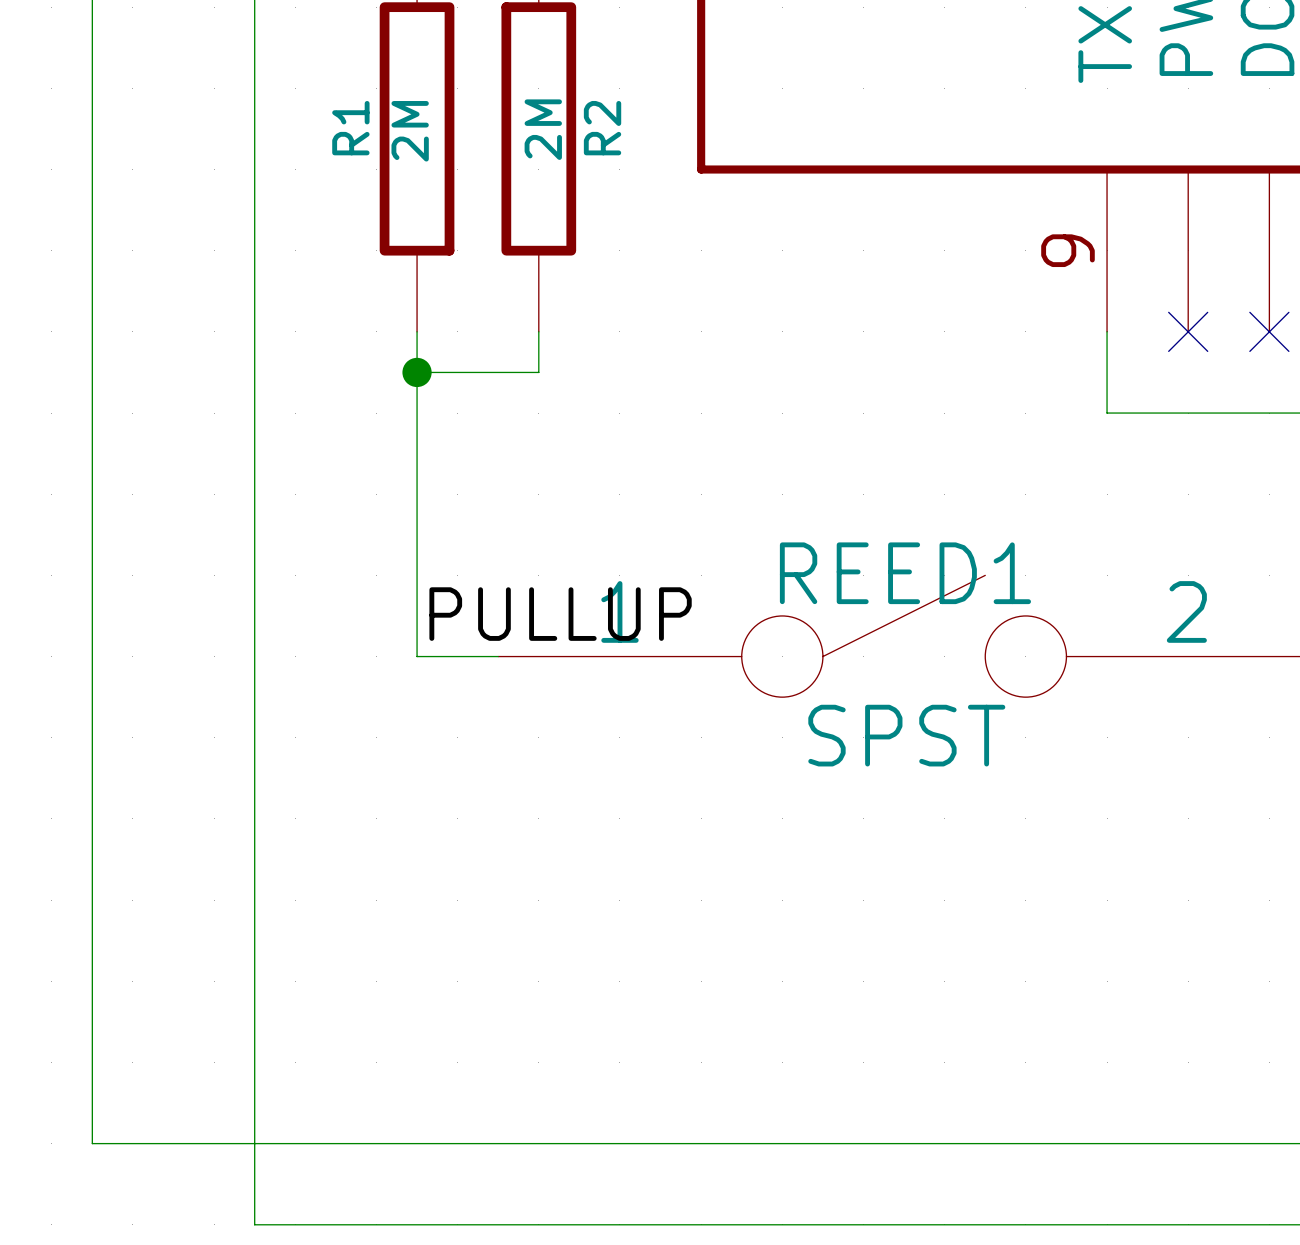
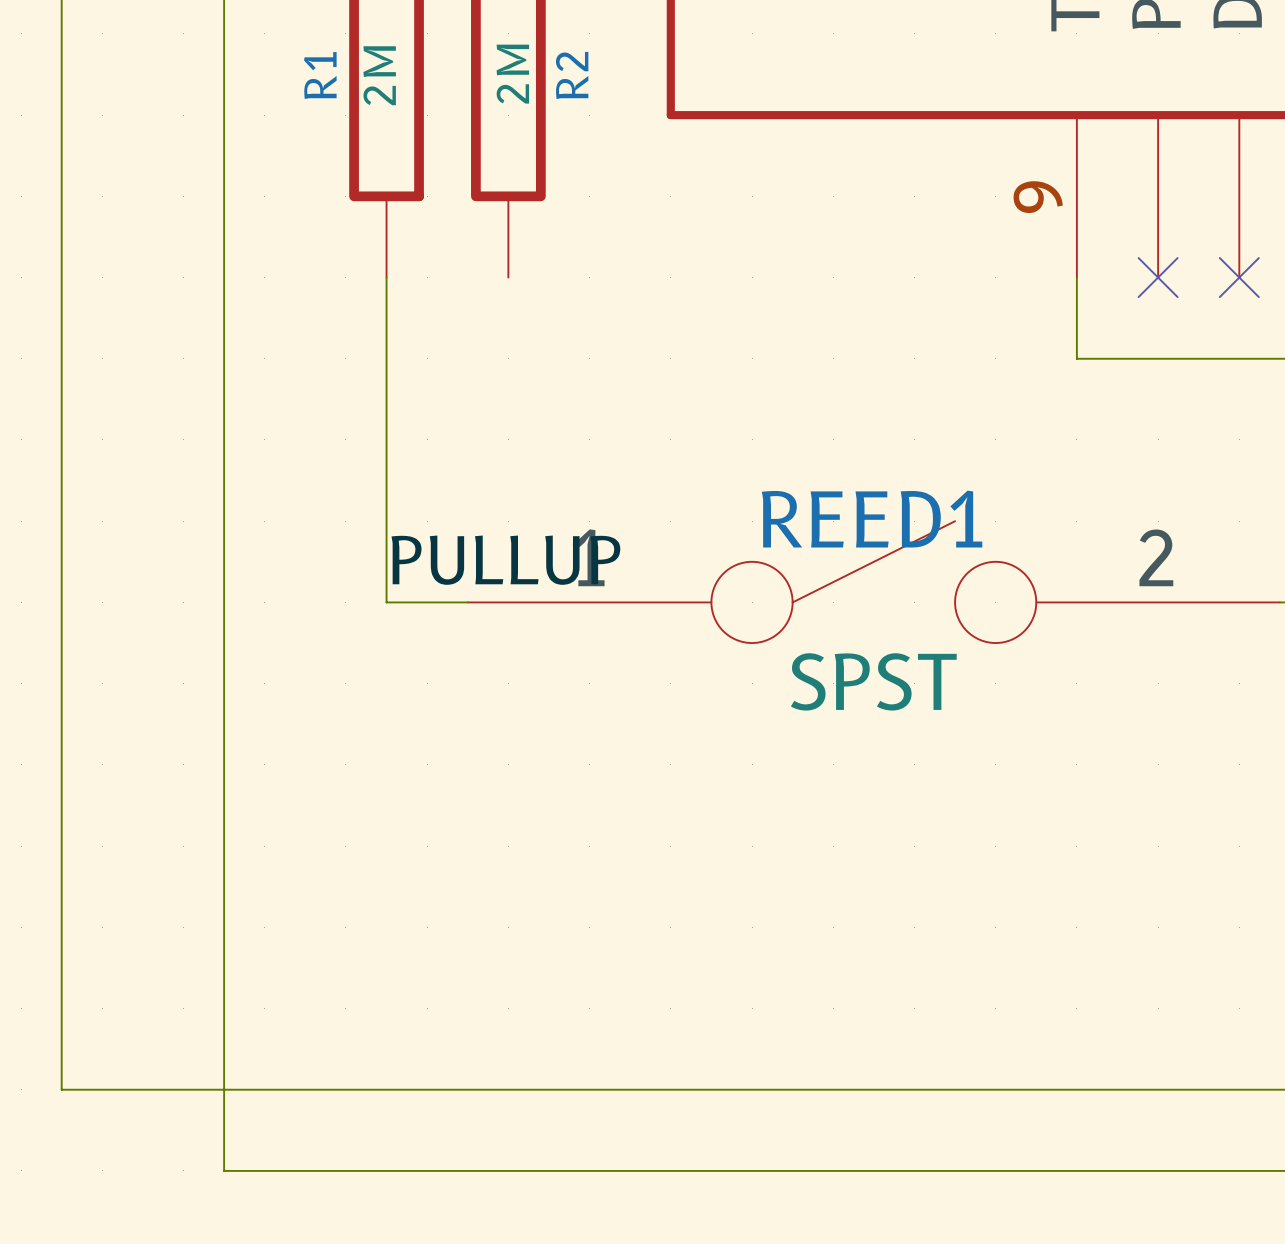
wire: (538, 331) (538, 372) (417, 372) -> none
junction: (417, 372) -> none

